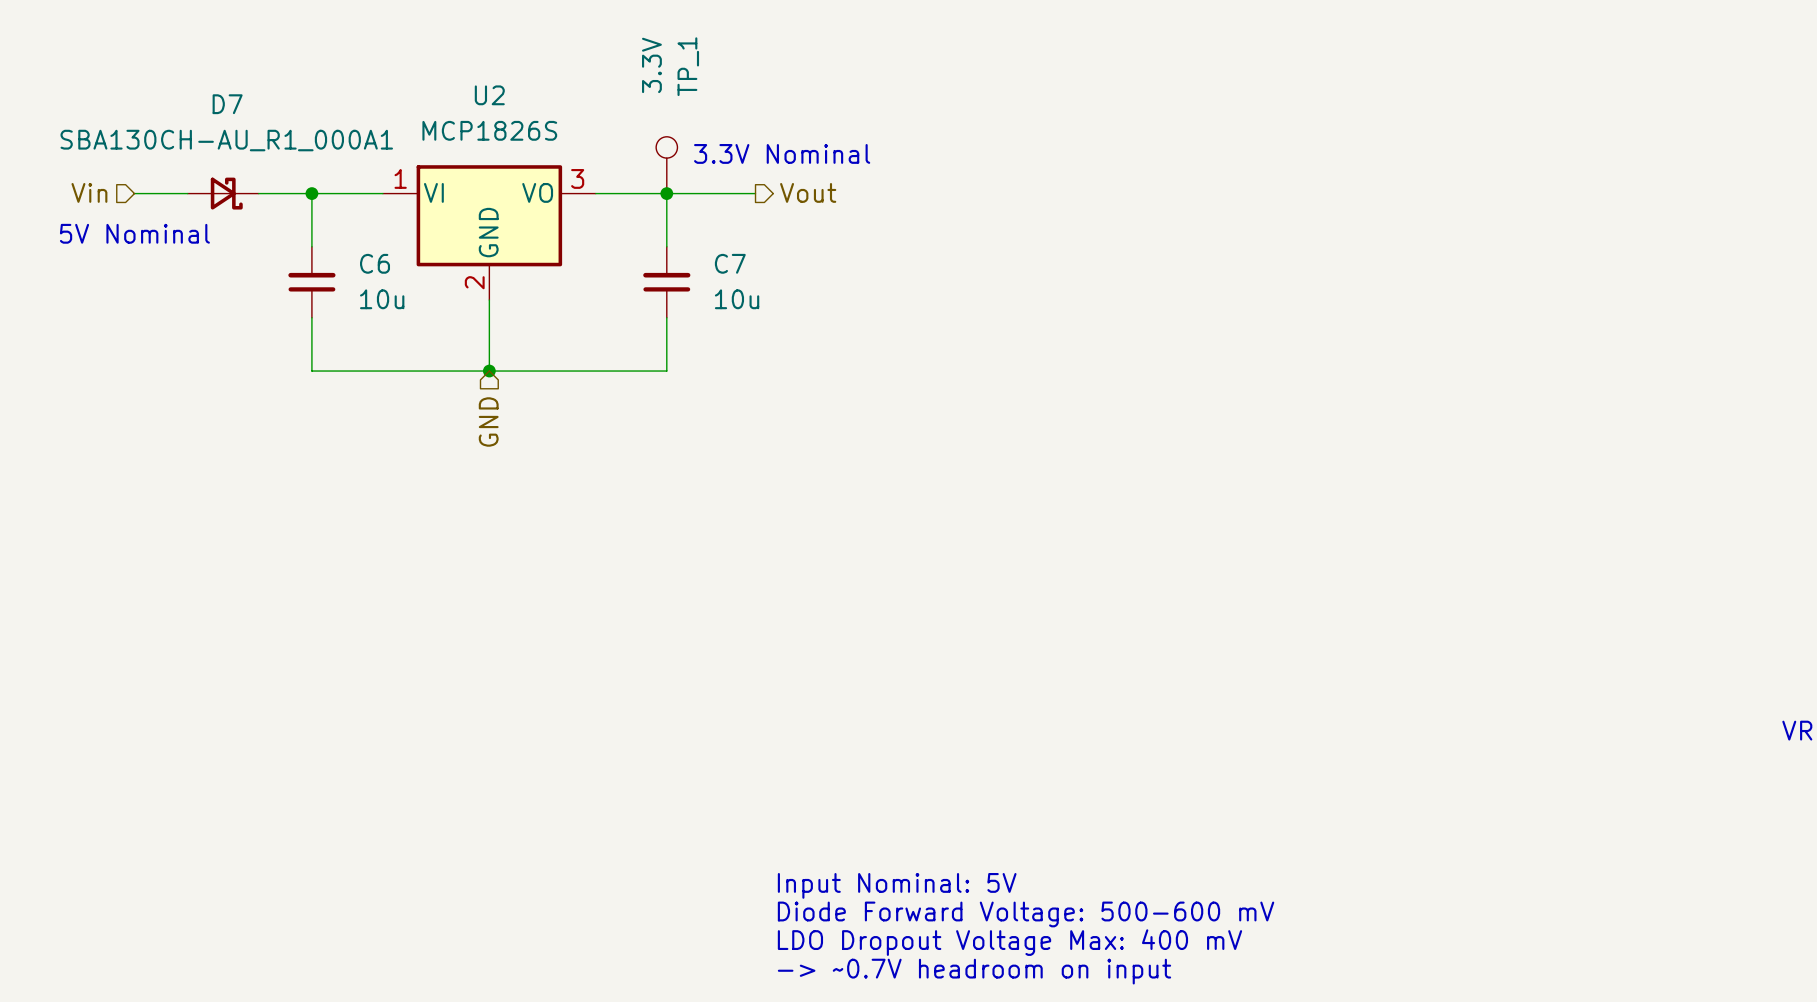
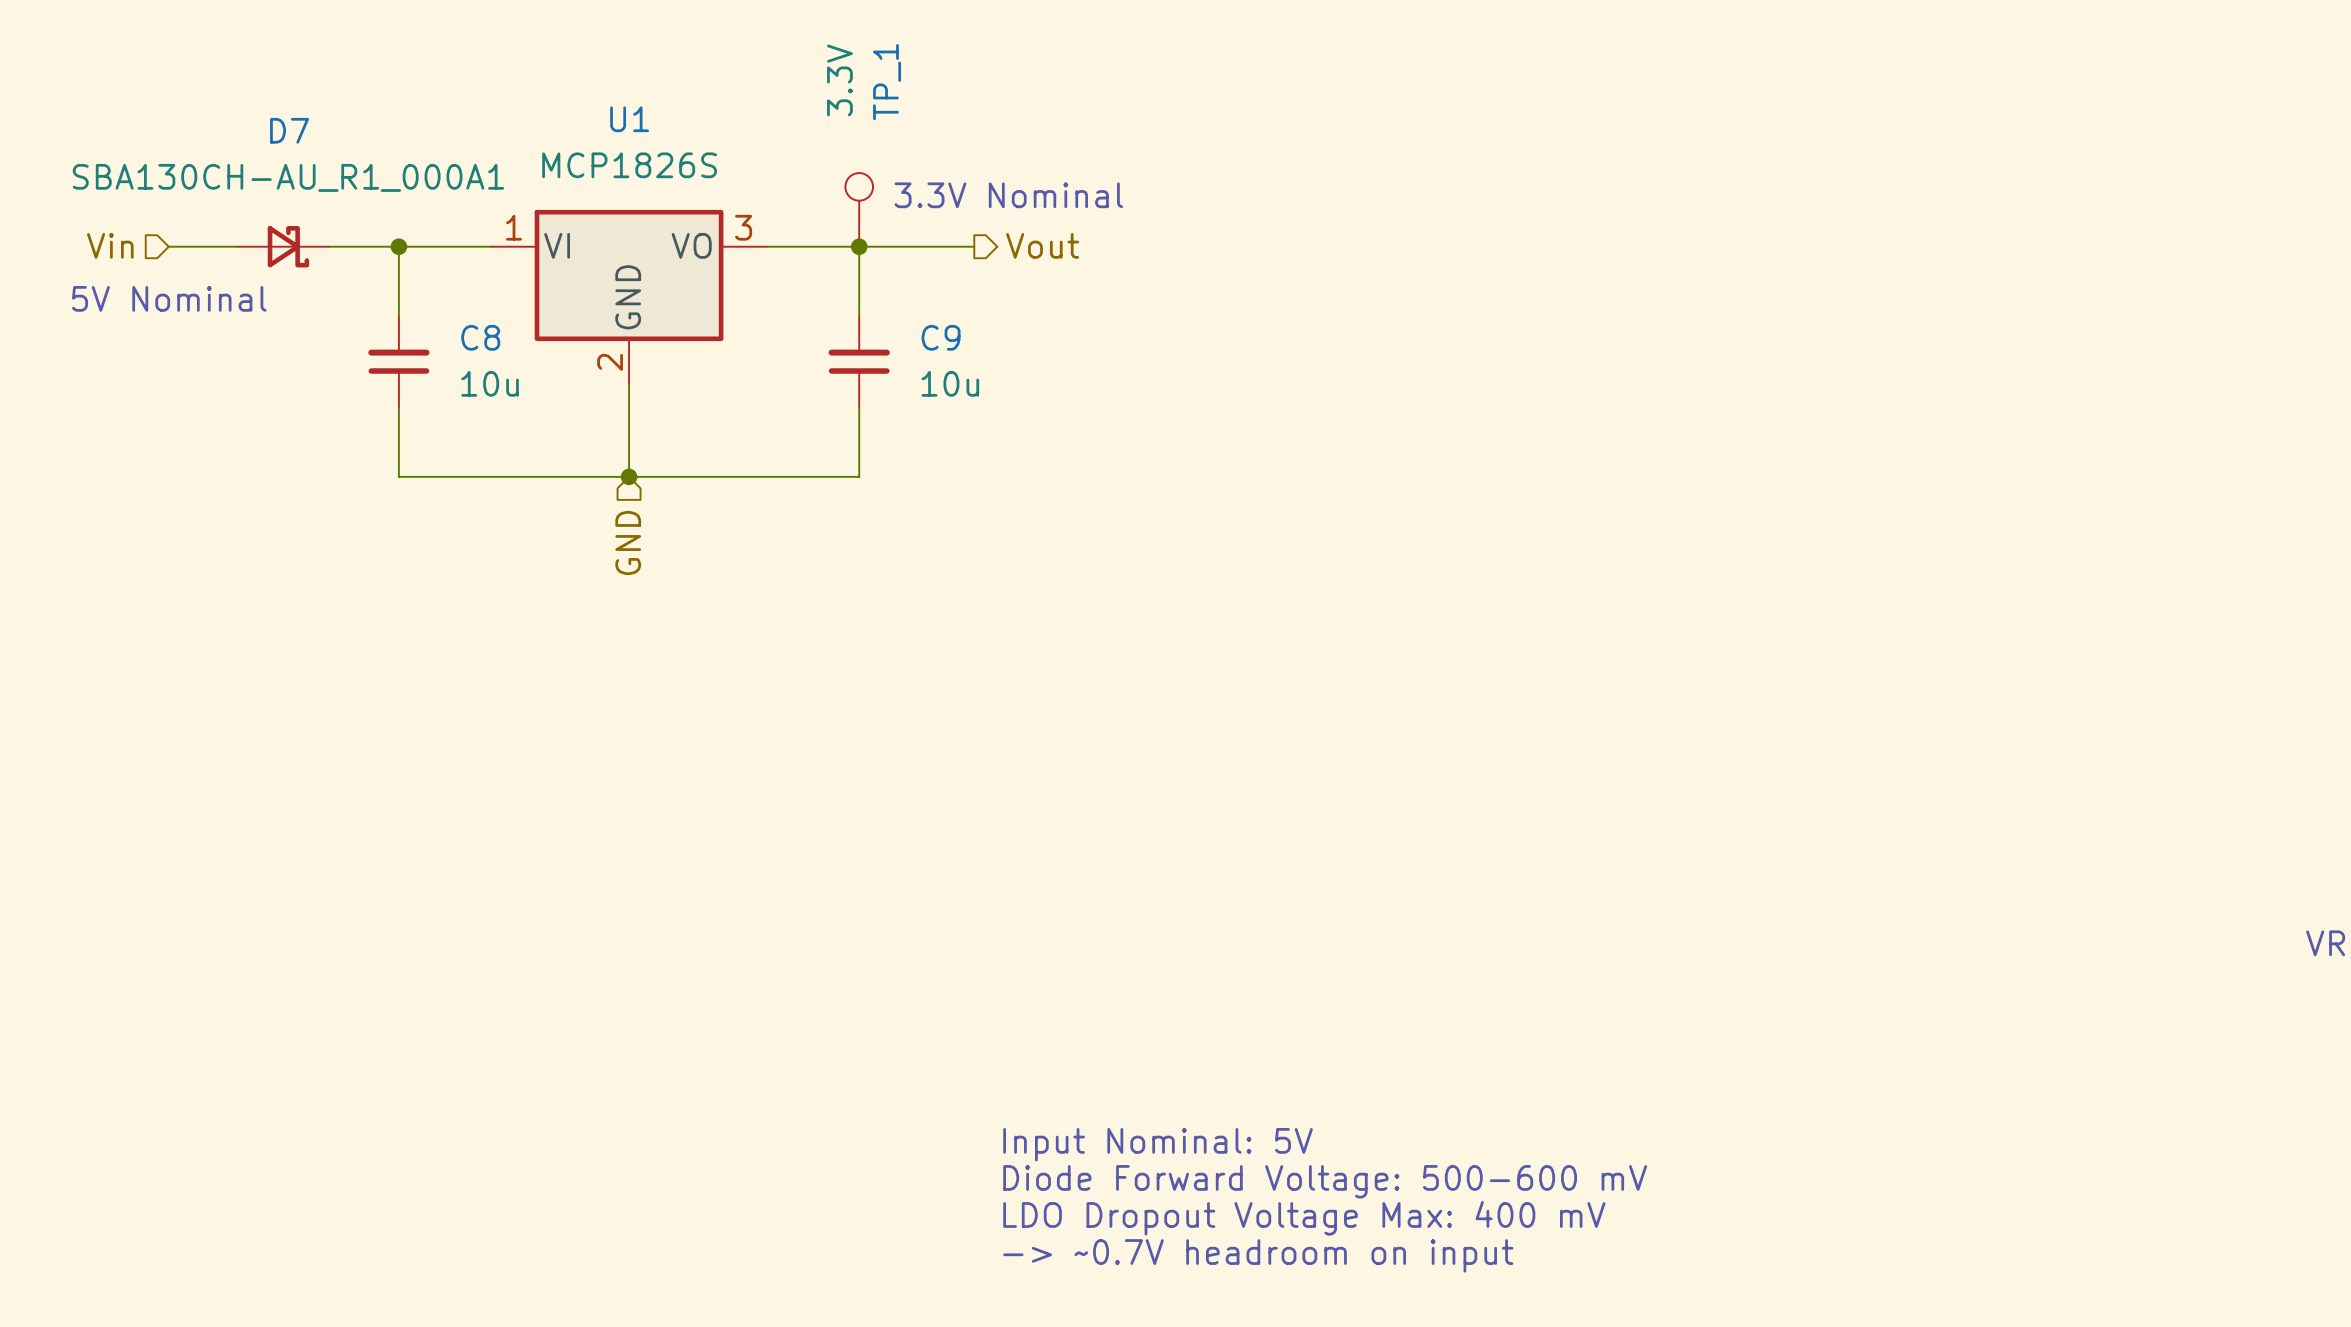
U2 name: U2 (489, 95) -> U1 (629, 119)
C6 name: C6 (375, 263) -> C8 (480, 337)
C7 name: C7 (730, 263) -> C9 (941, 337)

